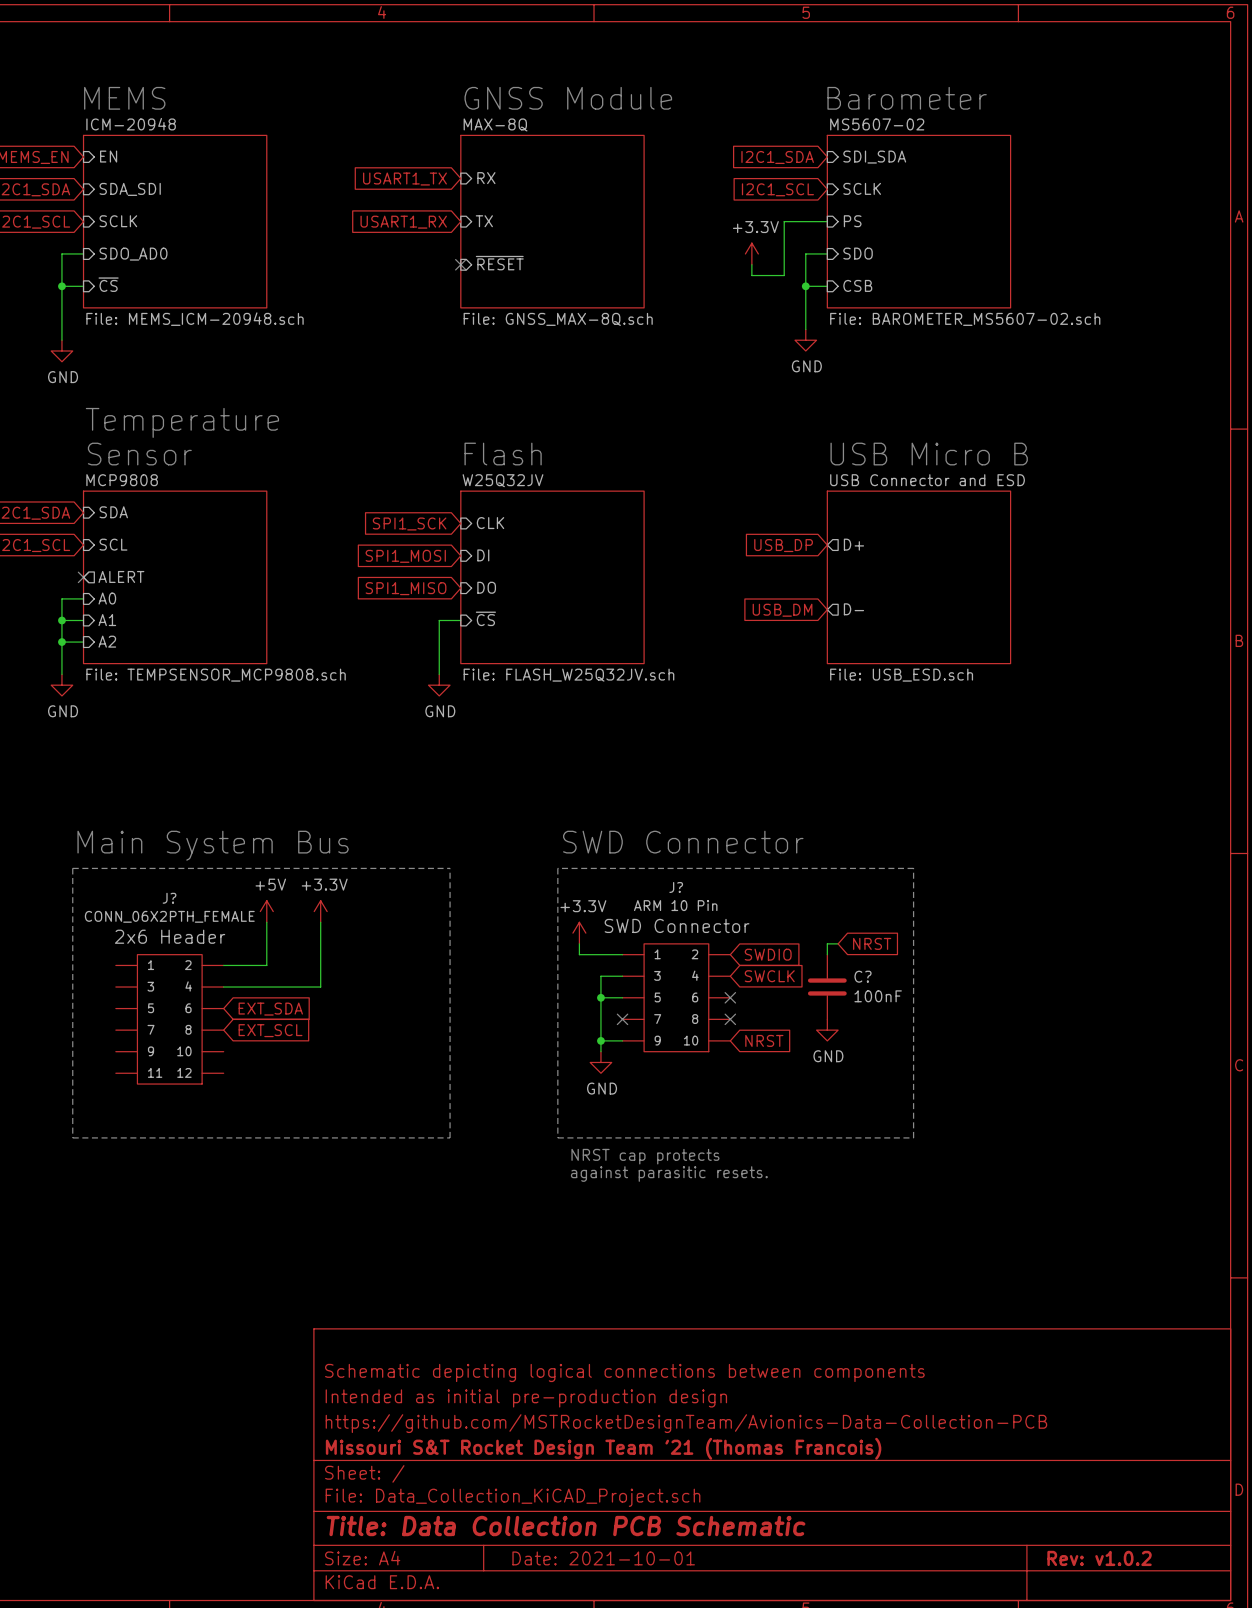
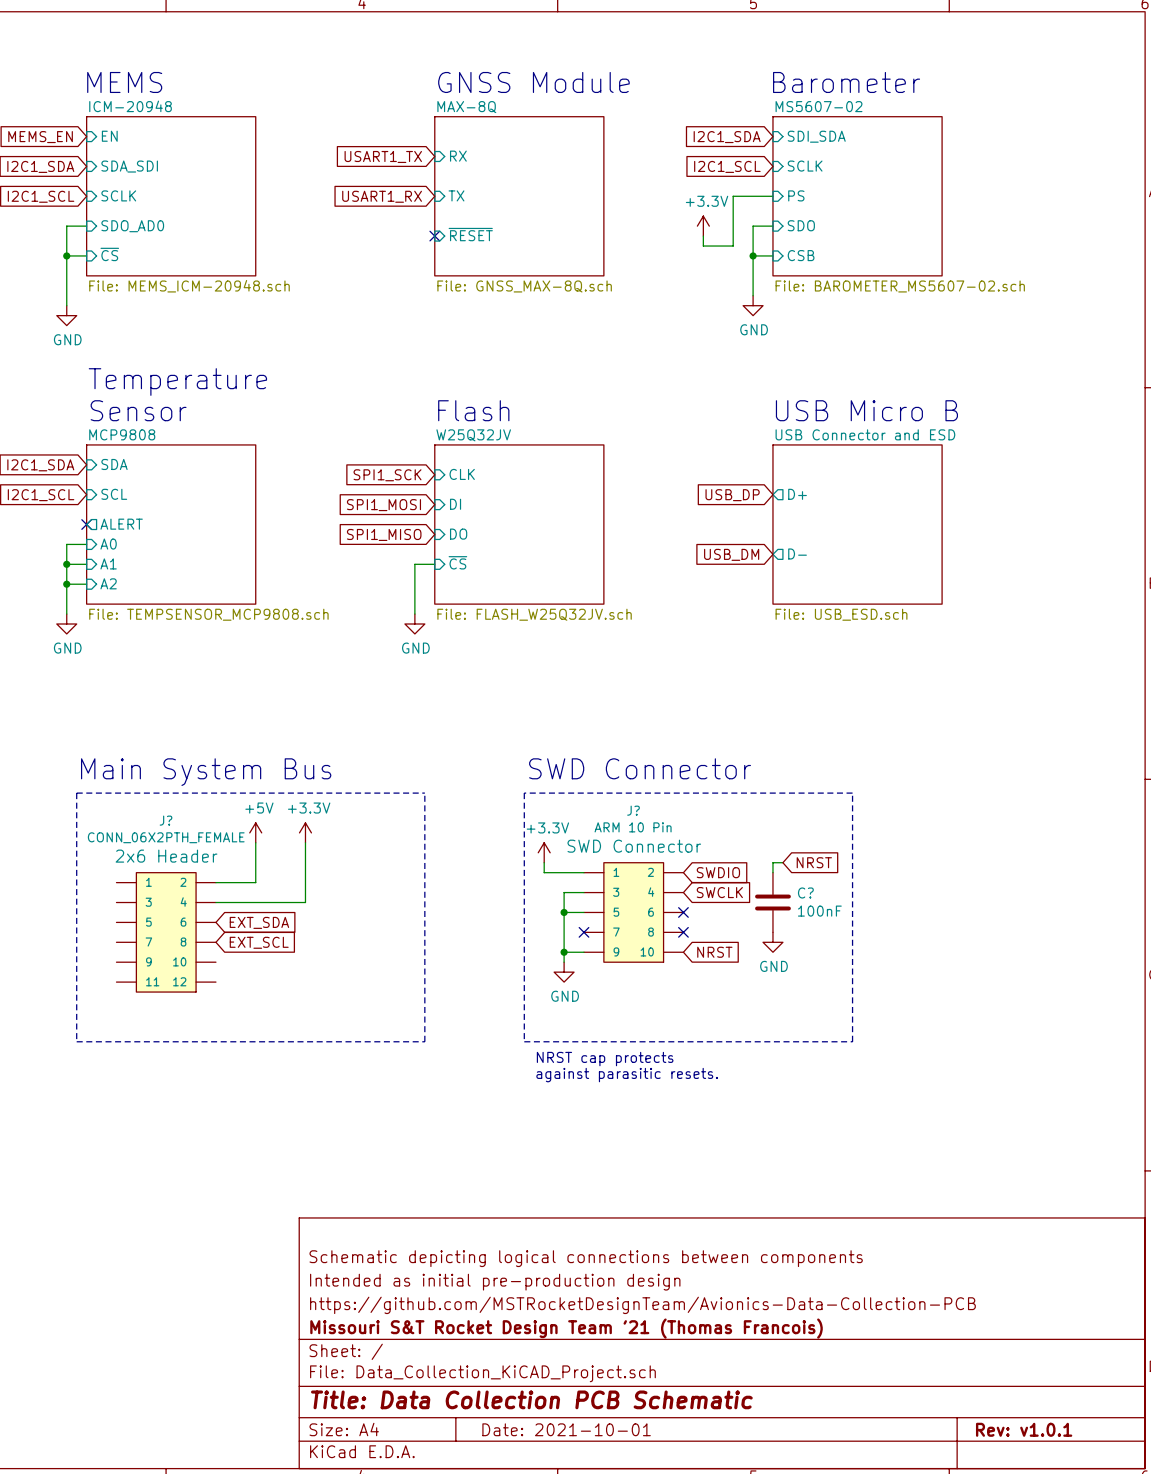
title block: Rev: v1.0.2 (1099, 1558) -> Rev: v1.0.1 (1024, 1429)

